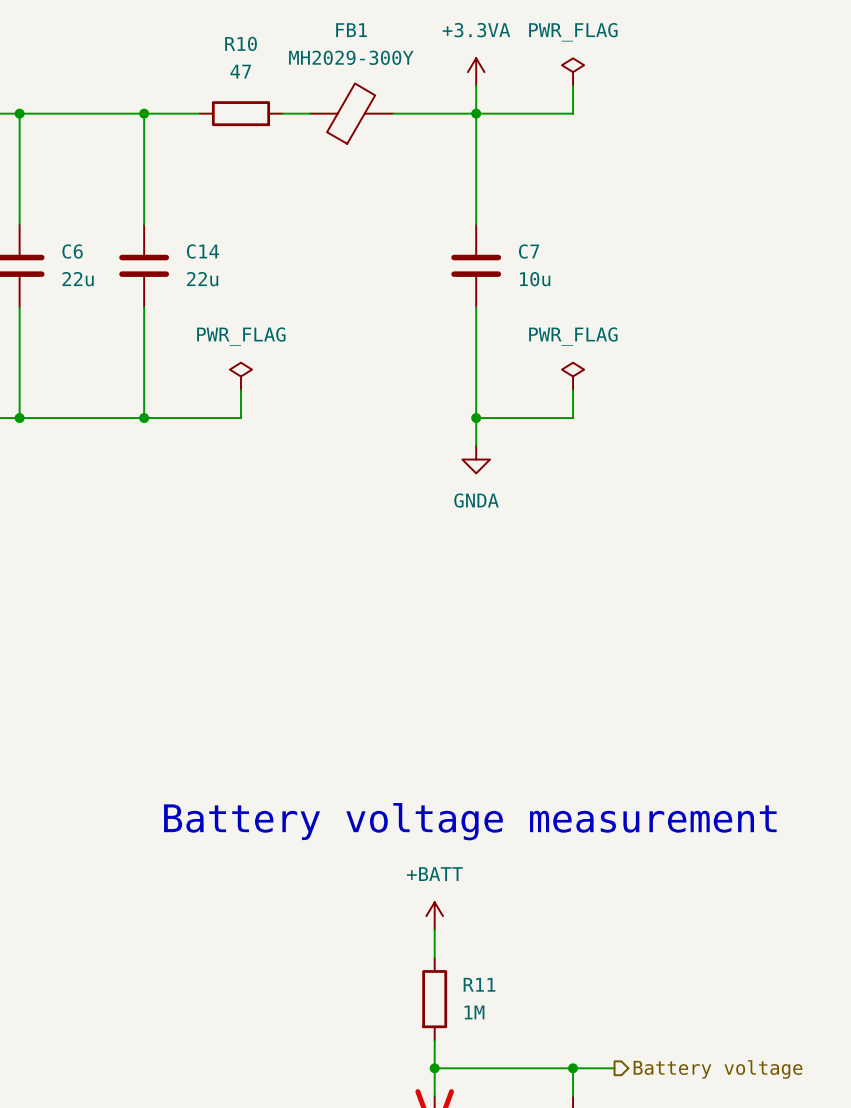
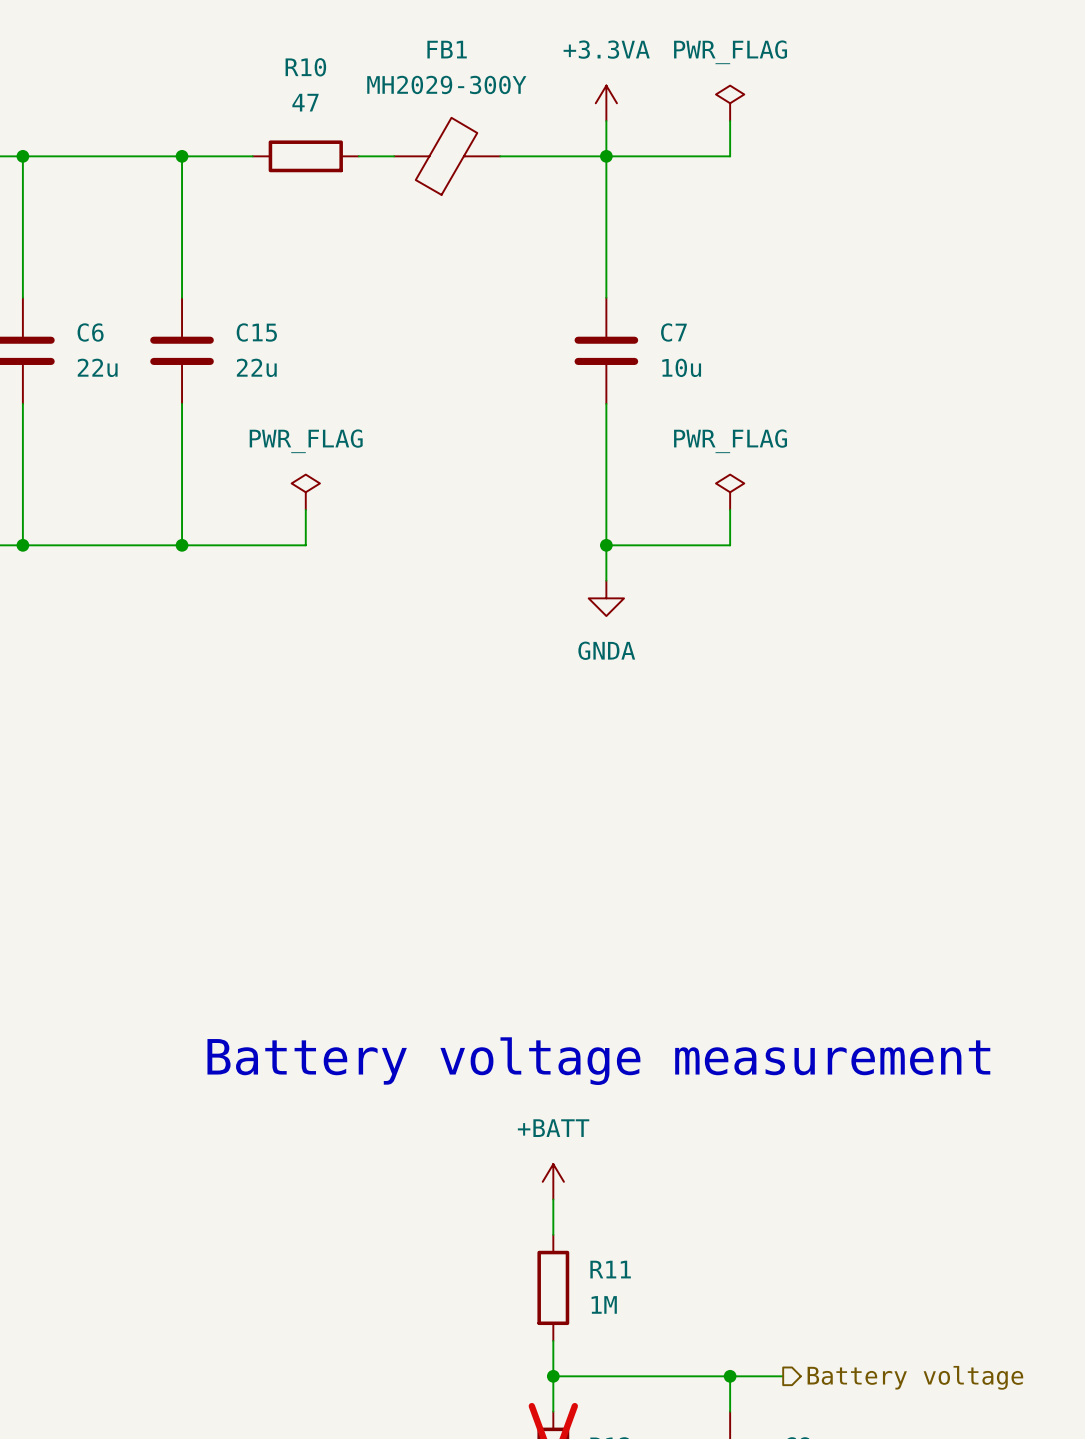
C14 name: C14 (202, 251) -> C15 (256, 332)

